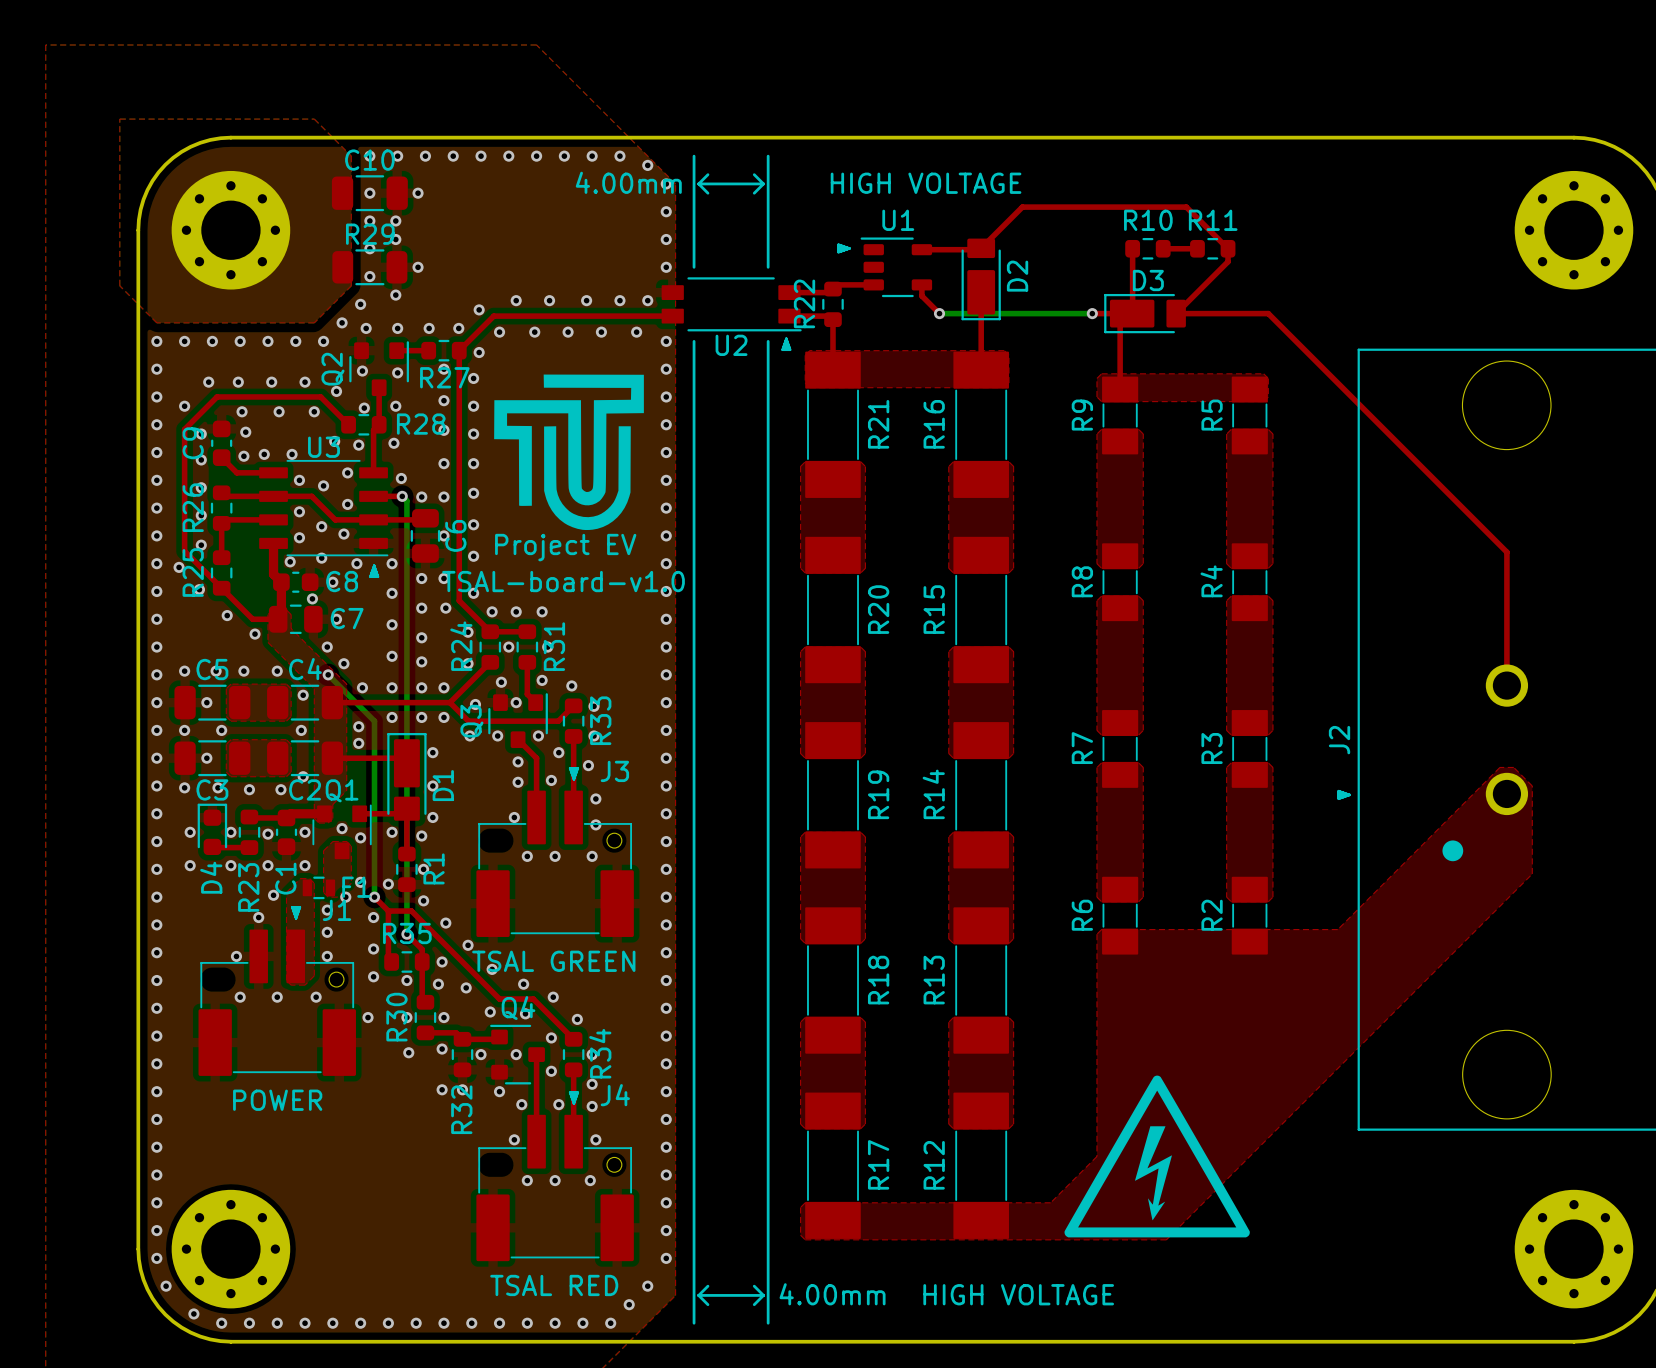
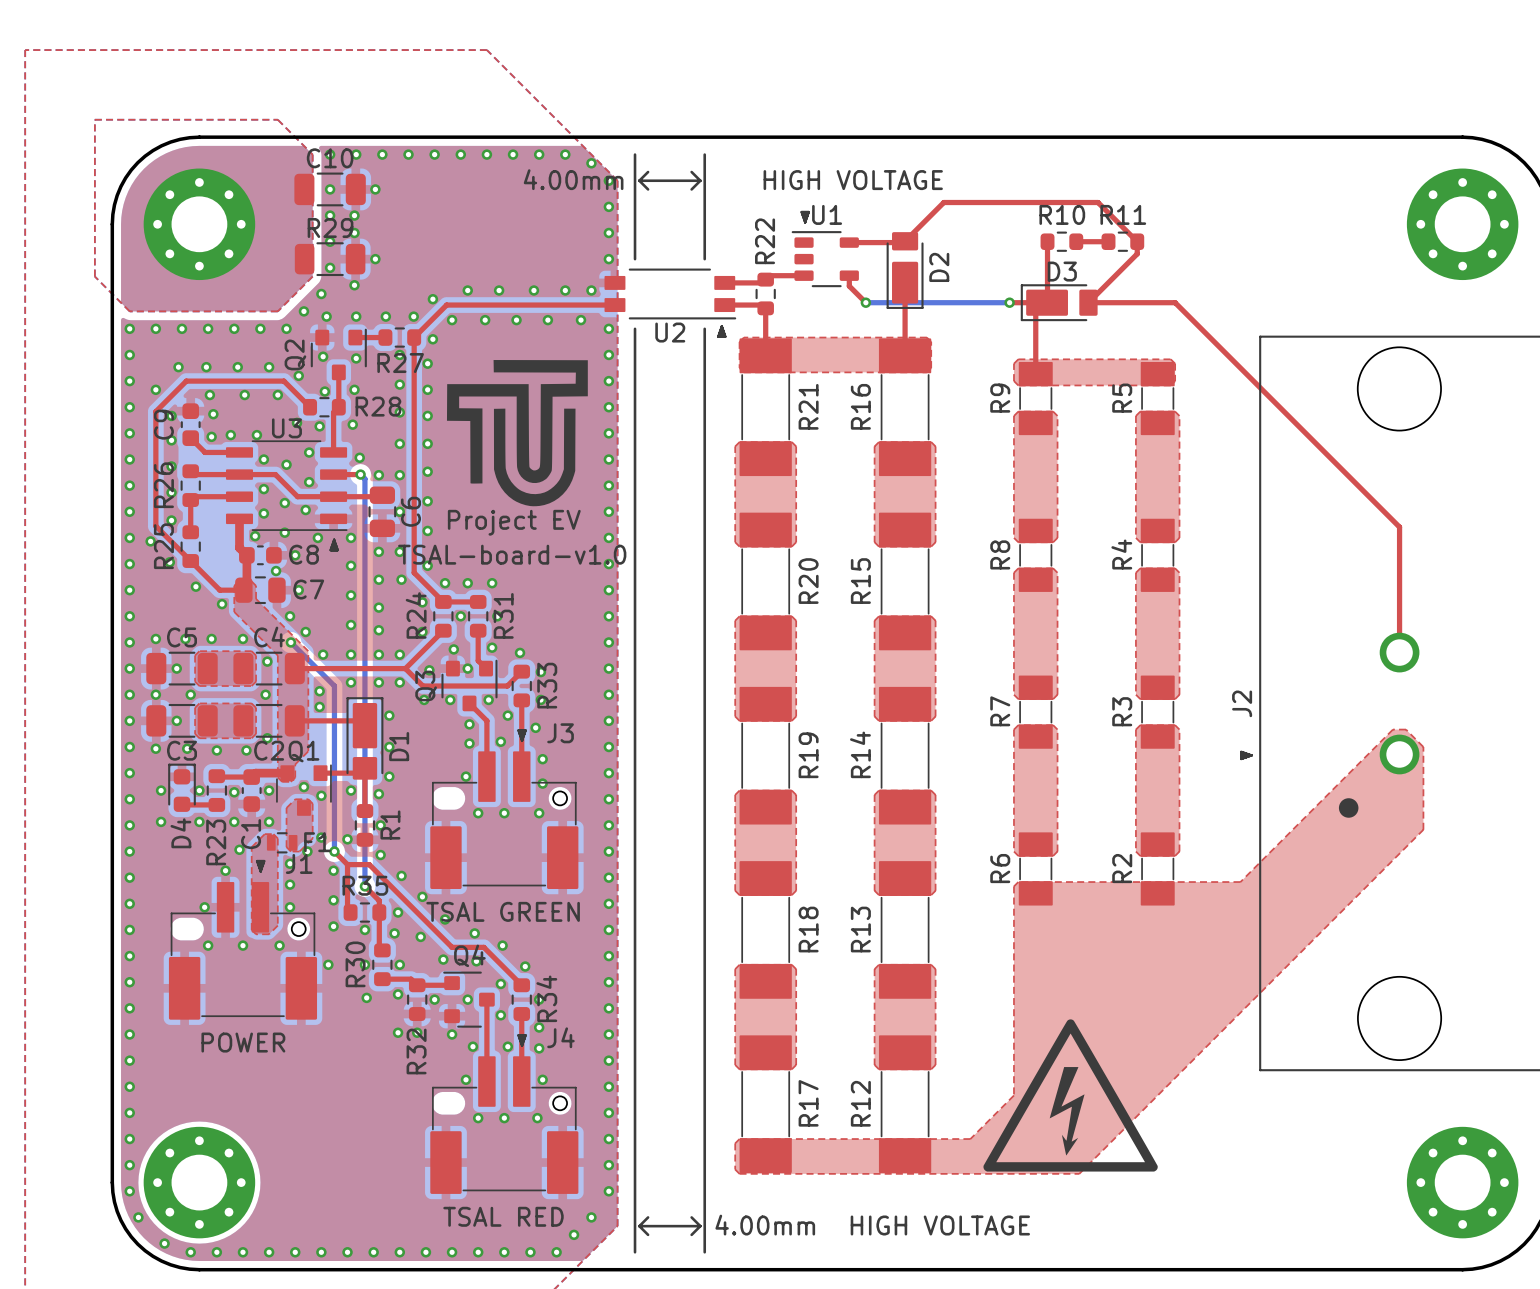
drawing position: (844, 248) -> (805, 217)
R22 name position: R22 (804, 303) -> R22 (765, 241)

